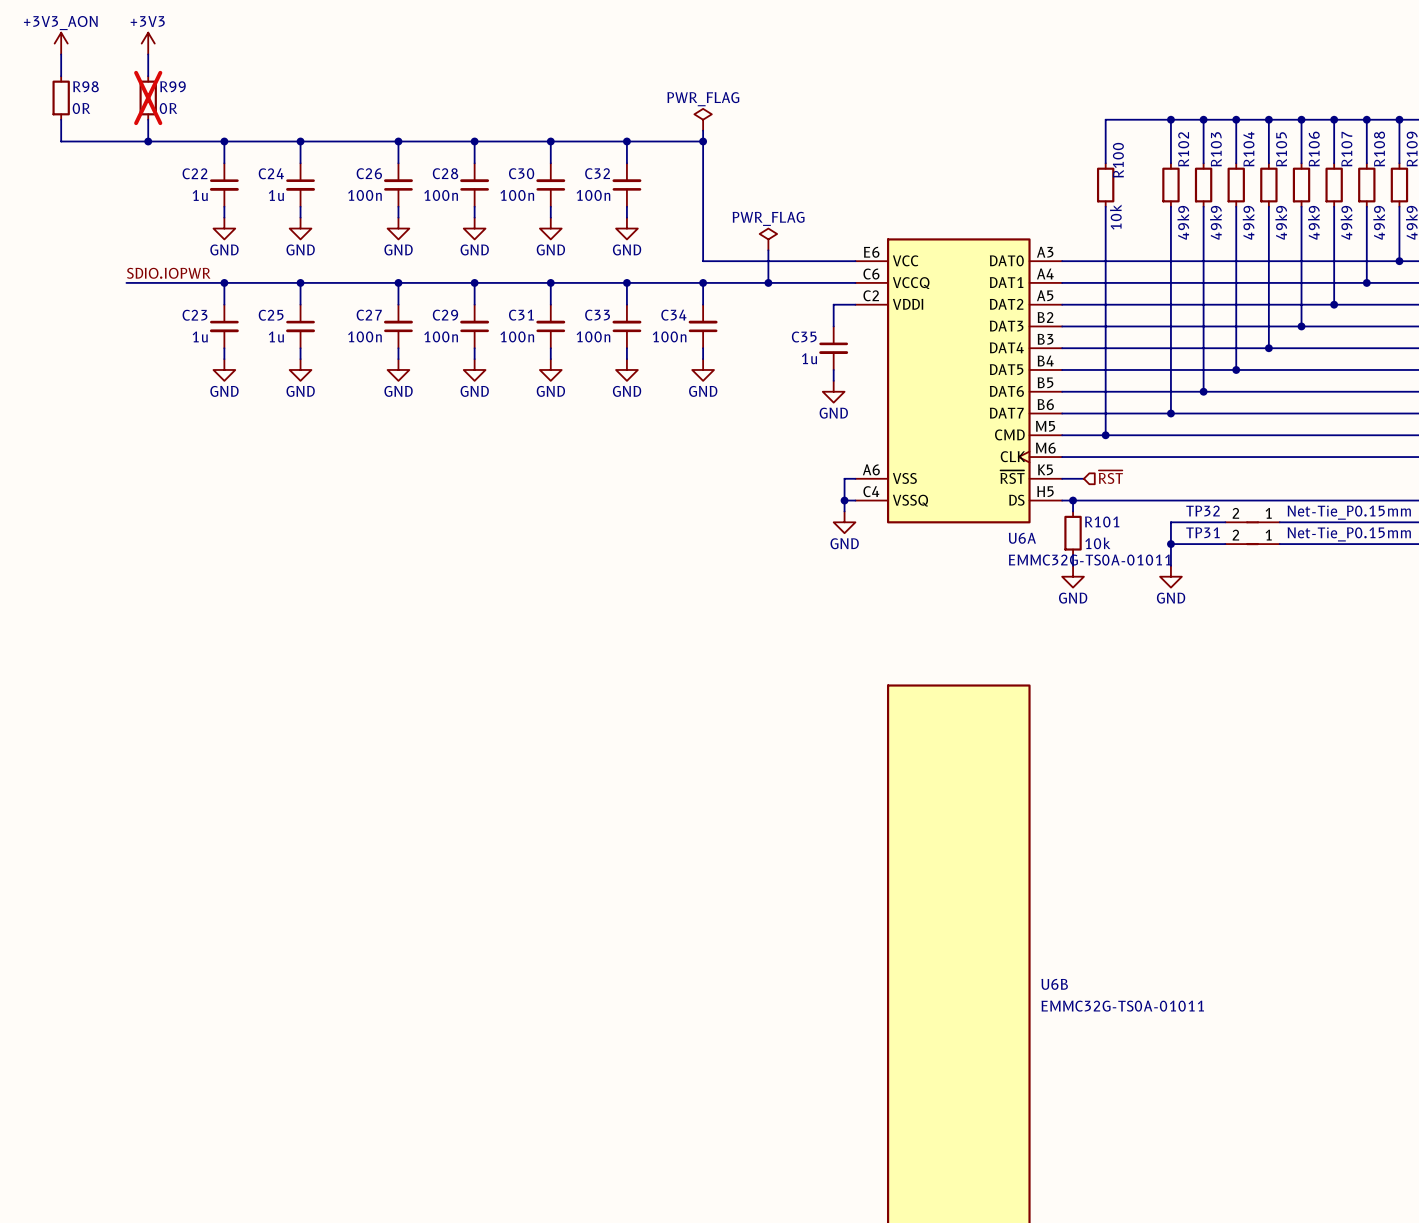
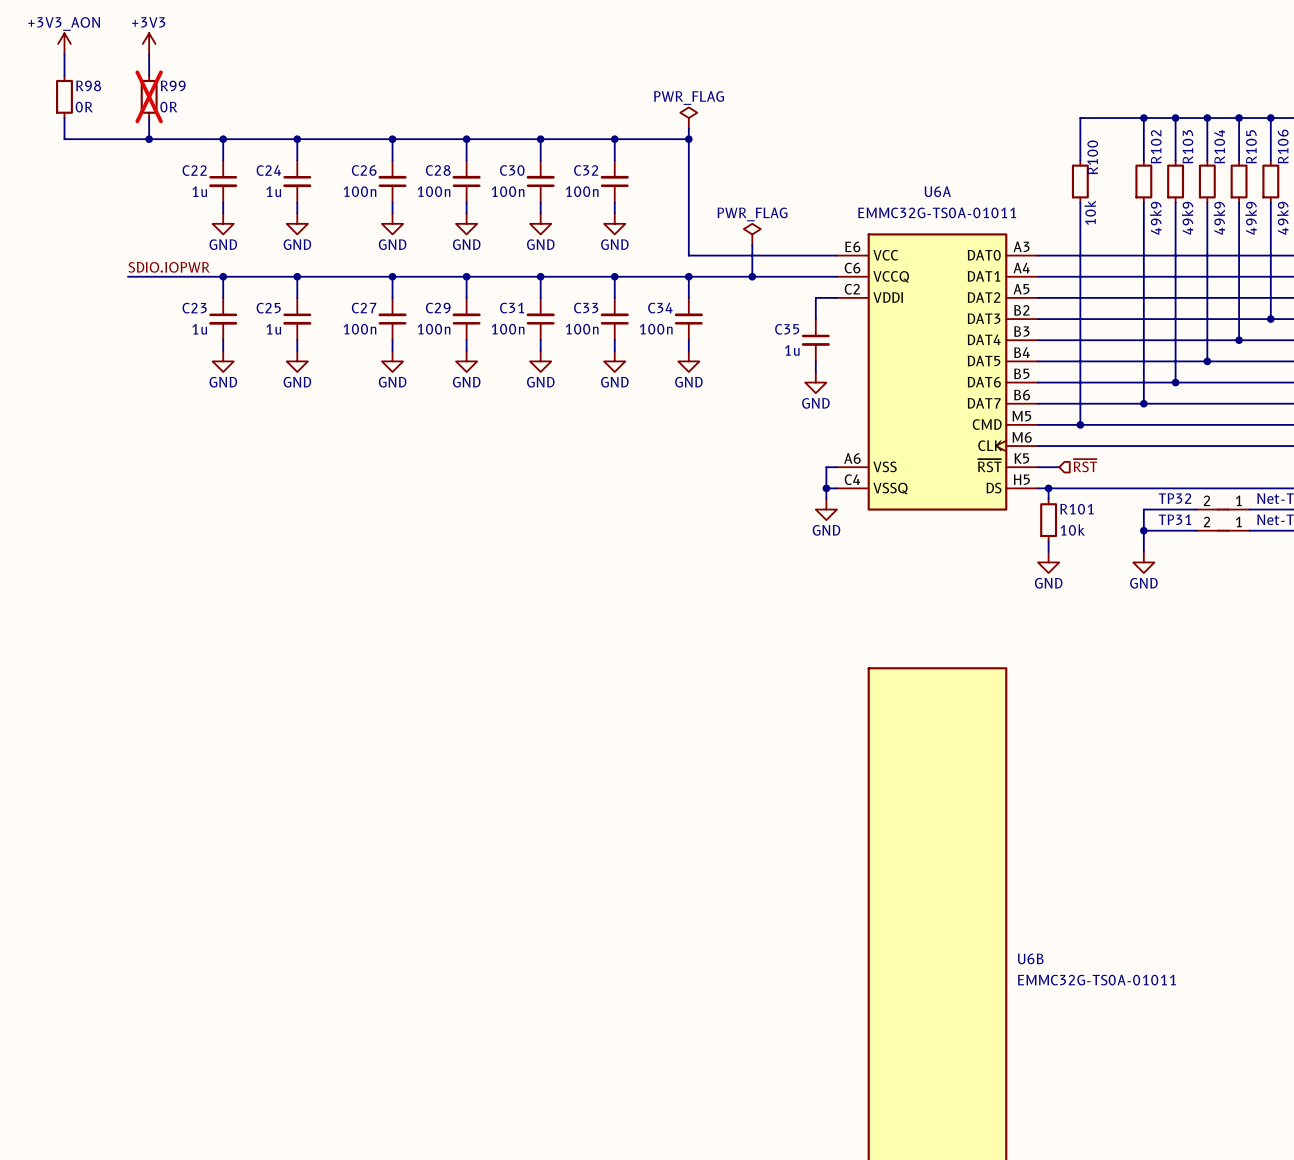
U6A name position: U6A (1022, 538) -> U6A (937, 191)
U6A text position: EMMC32G-TS0A-01011 (1090, 560) -> EMMC32G-TS0A-01011 (937, 212)

